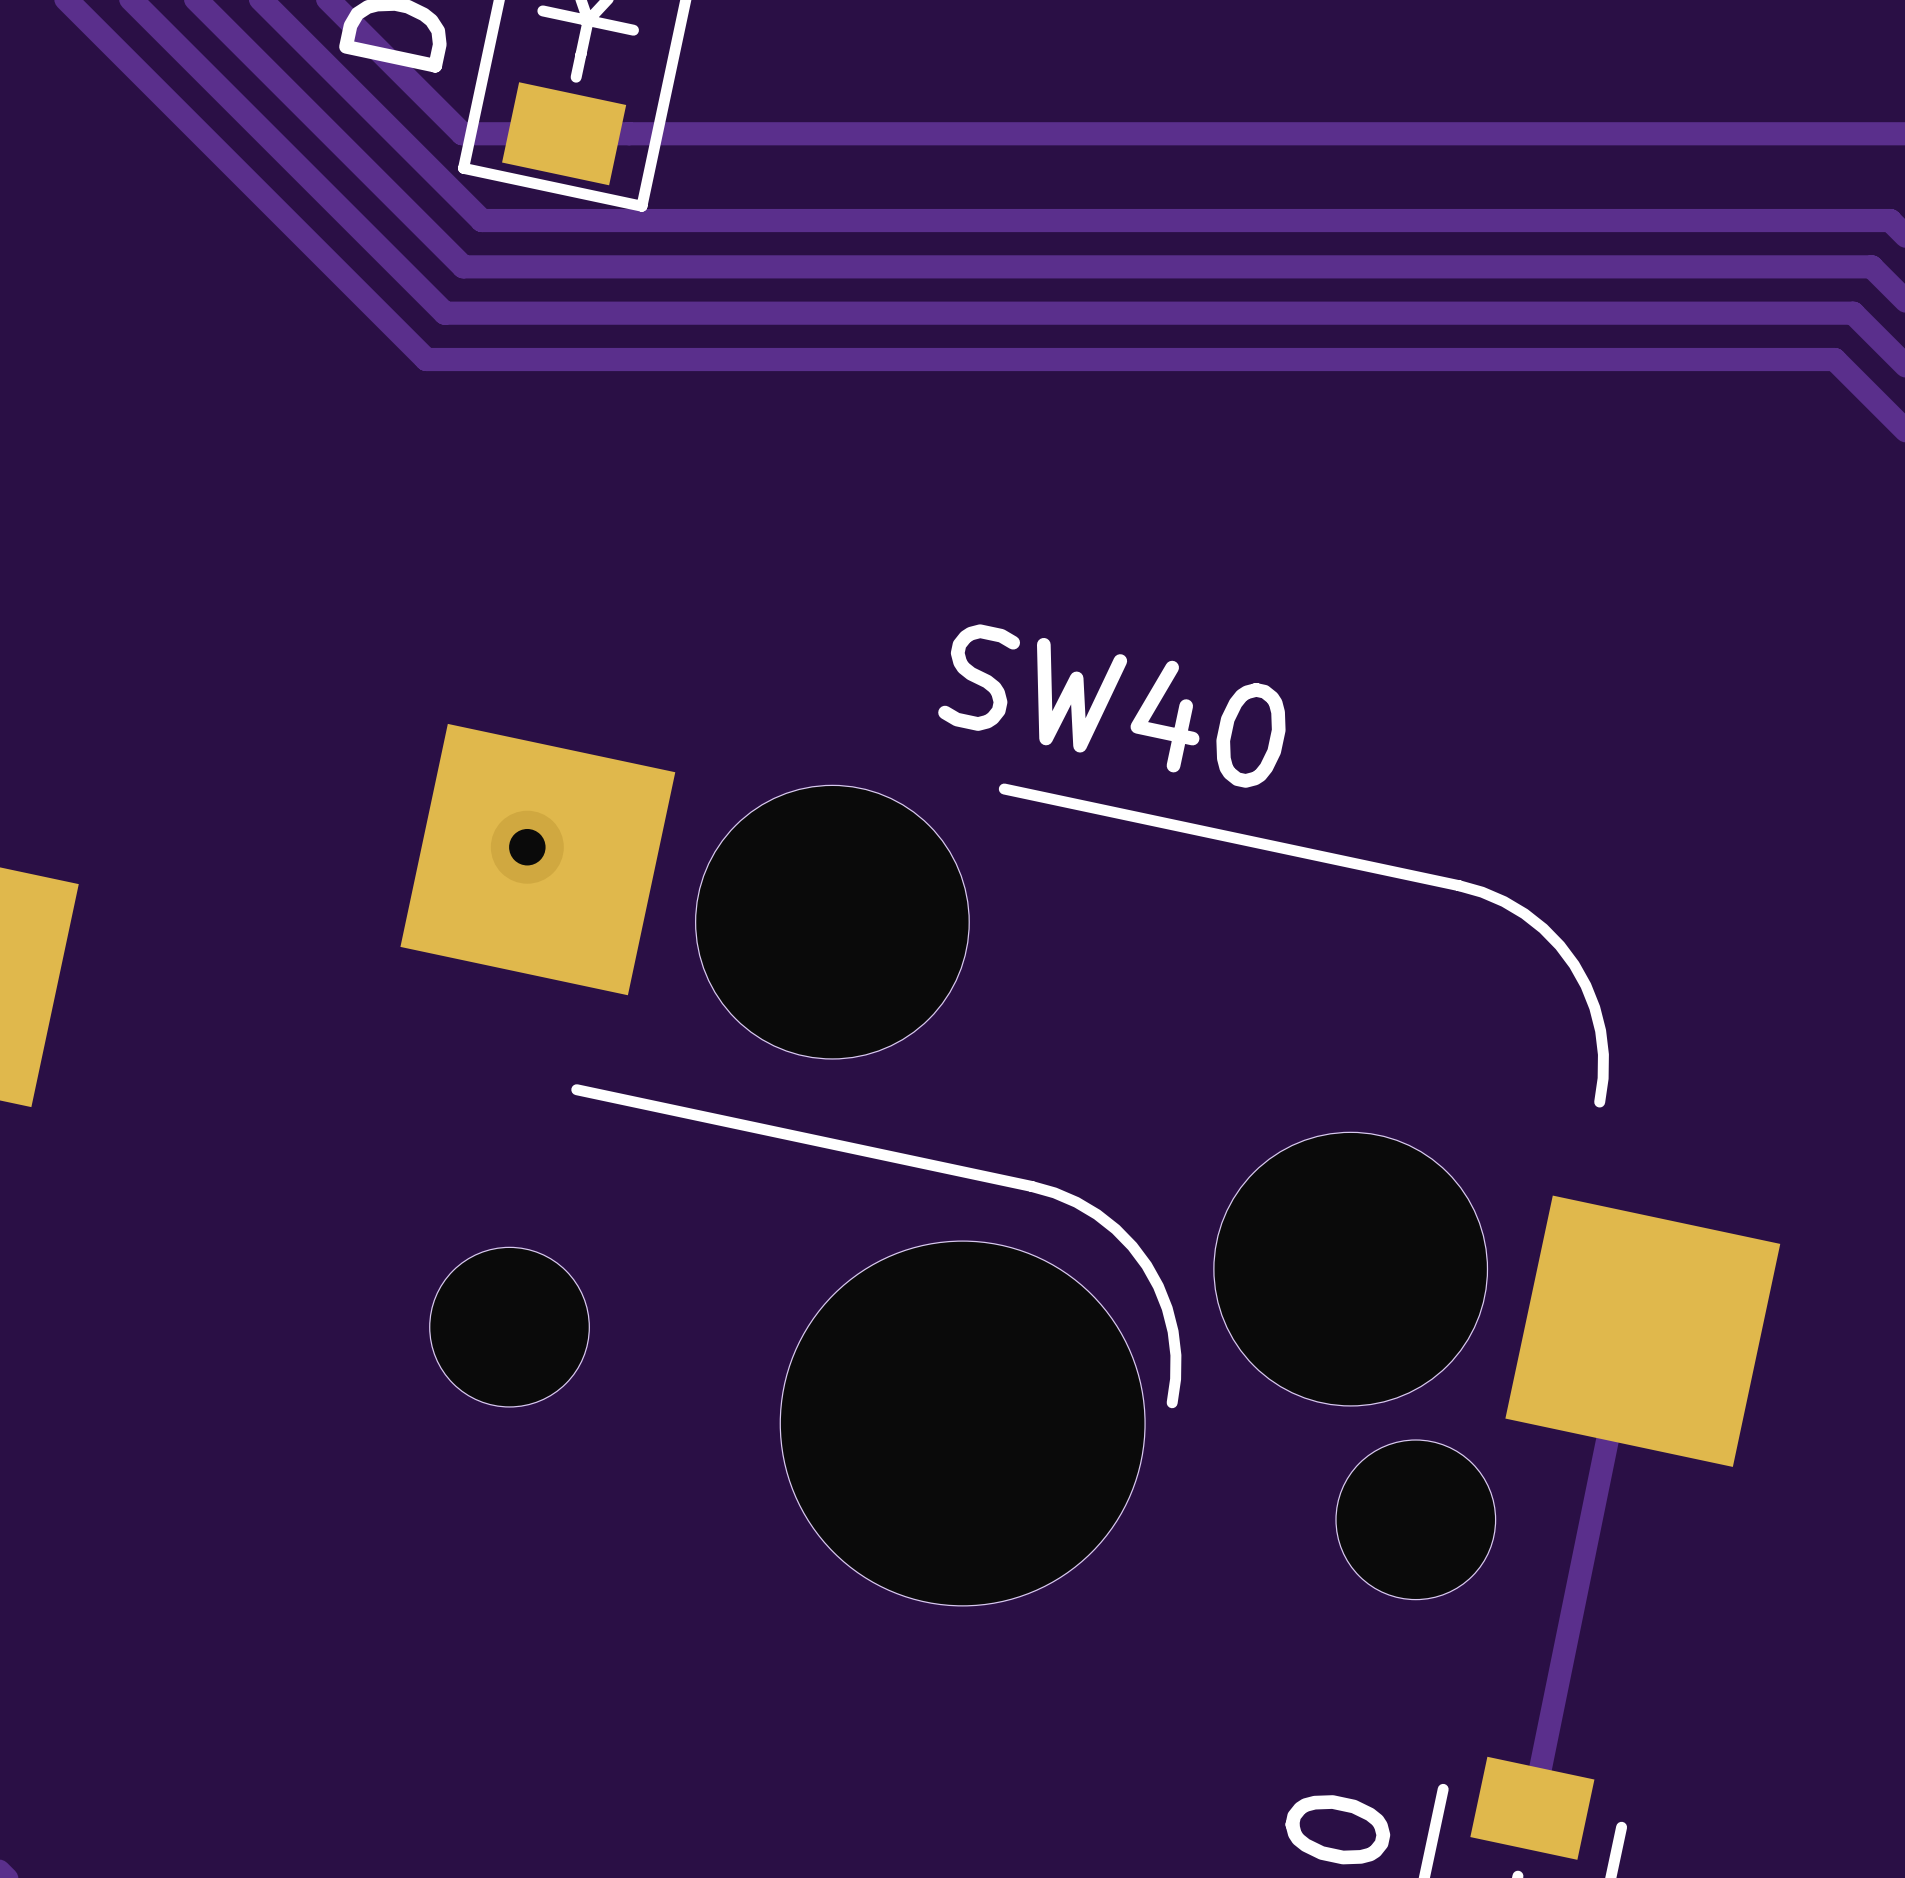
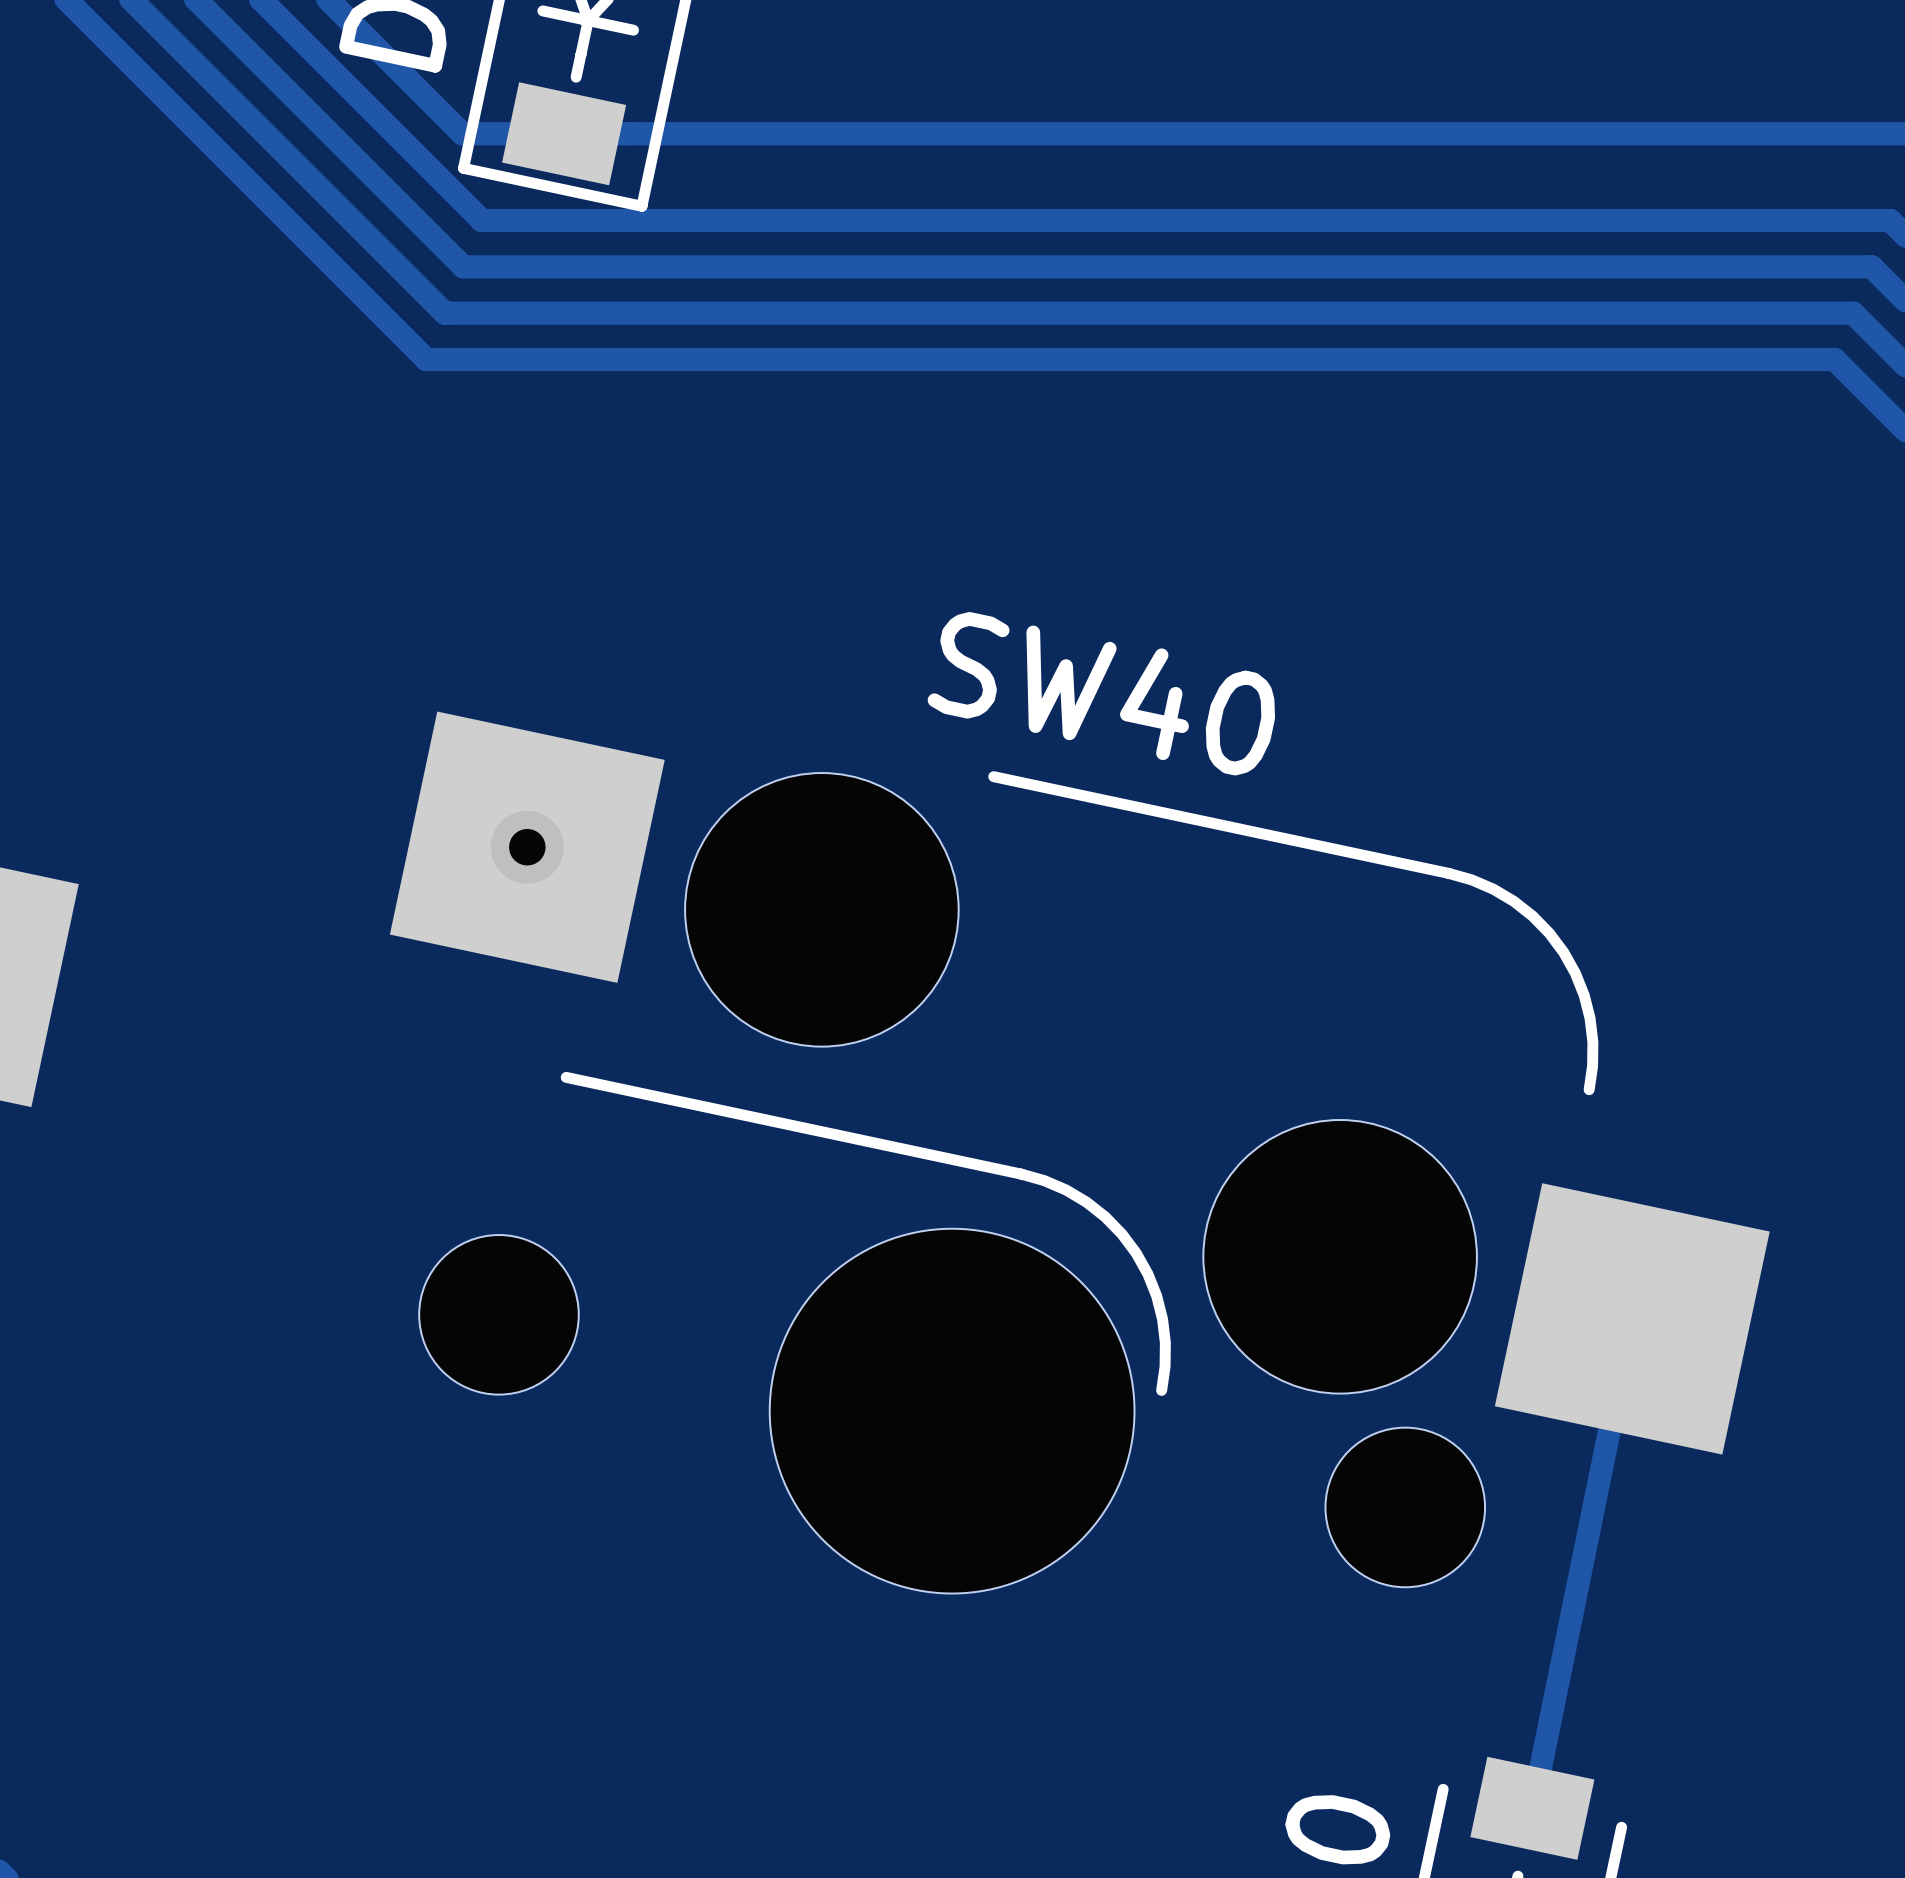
SW40 position: (1090, 1164) -> (1079, 1152)

